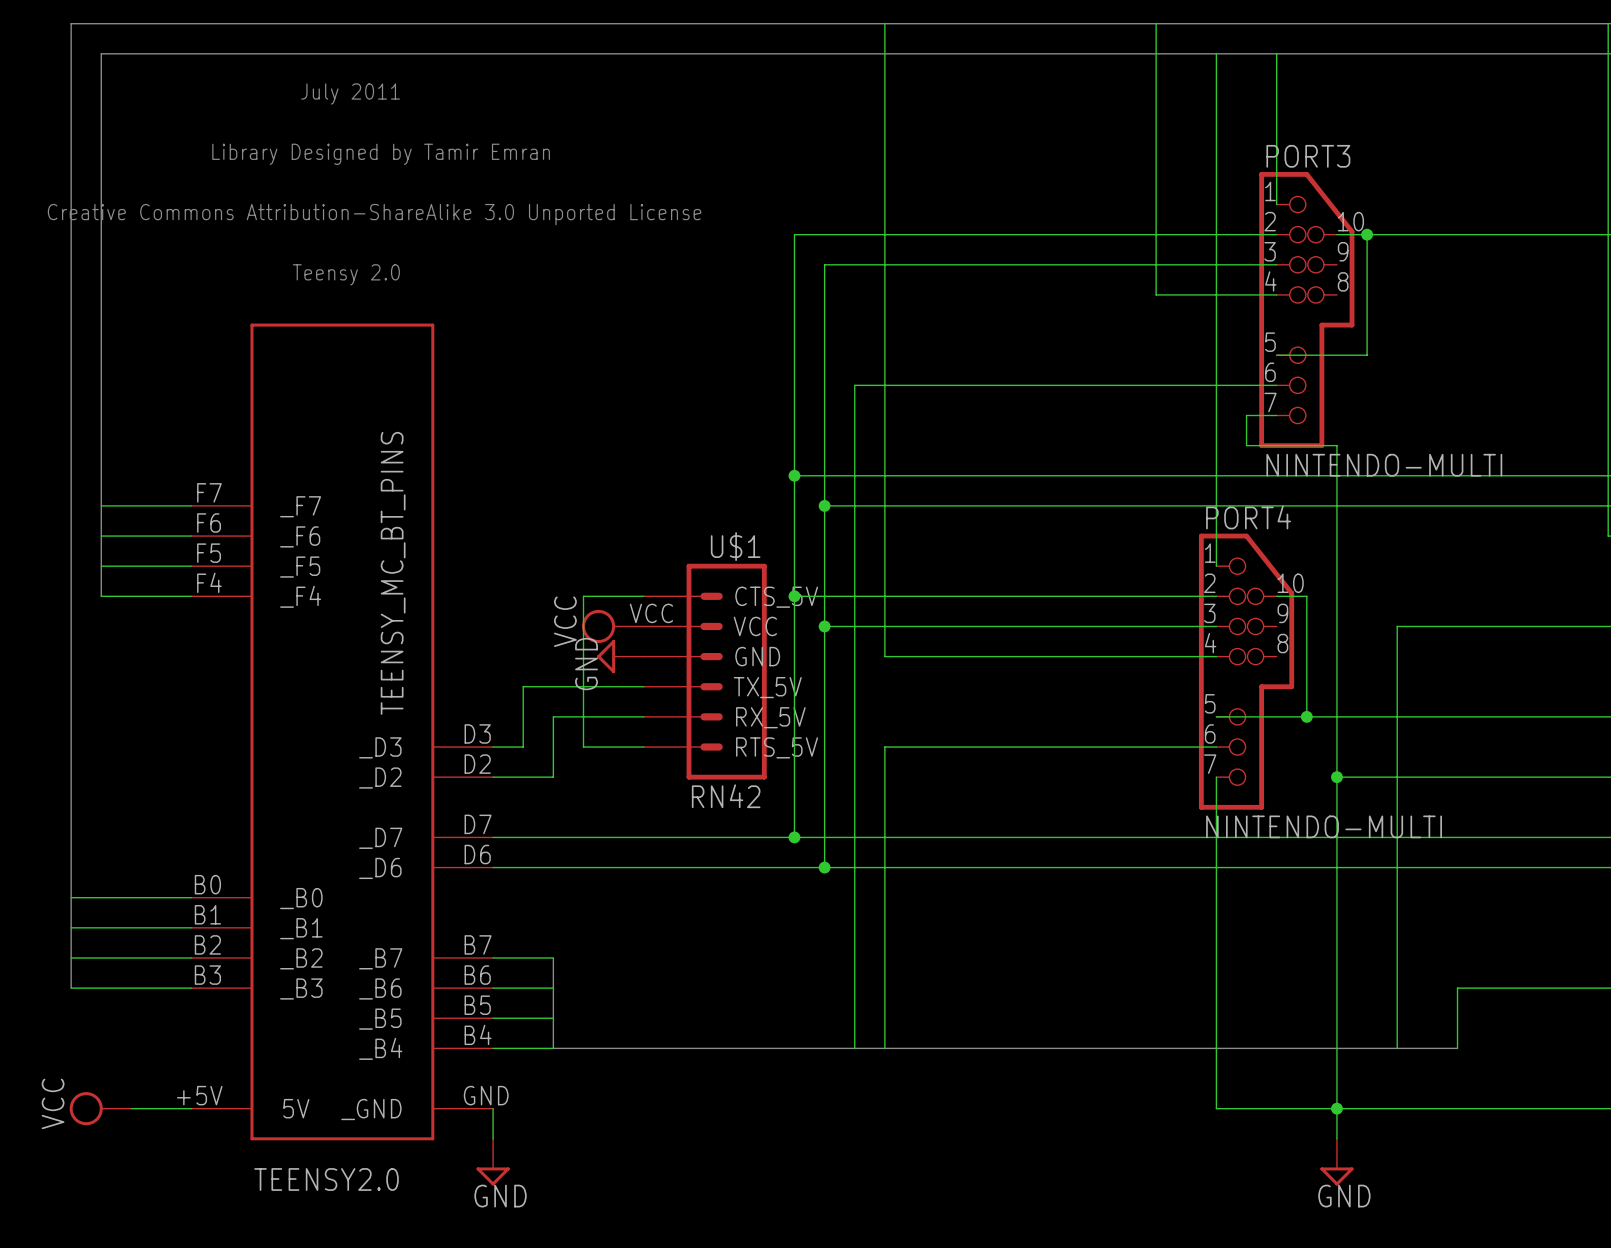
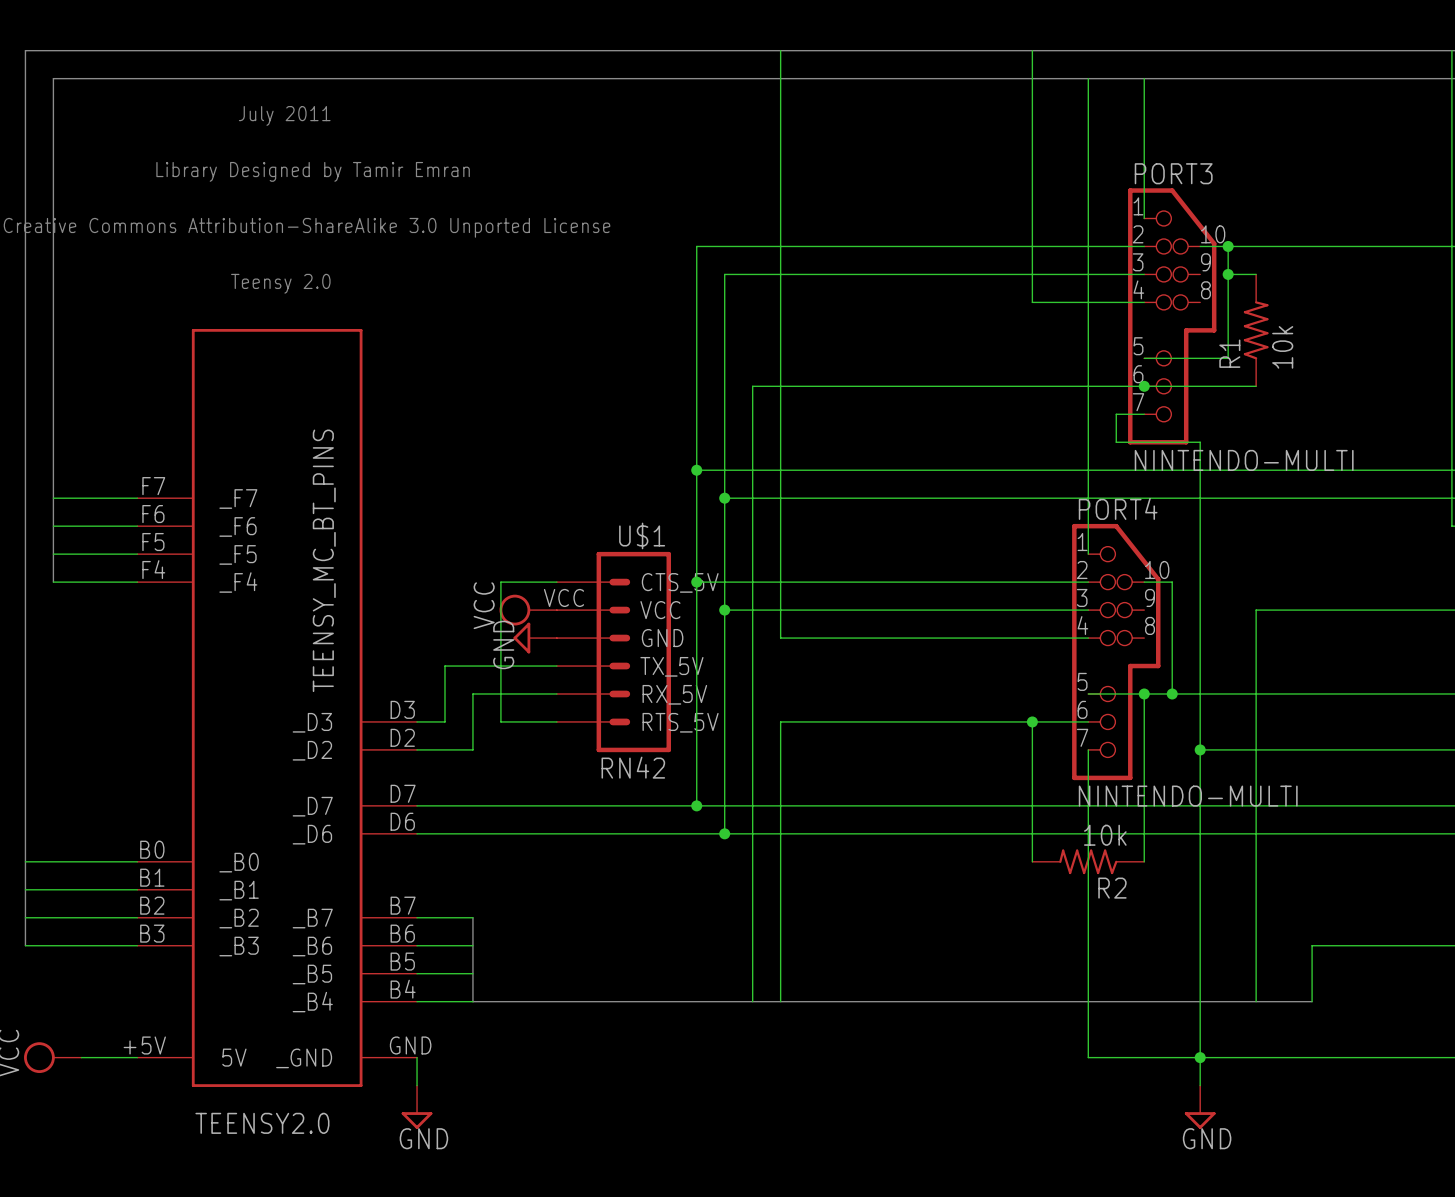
wire: none -> (1228, 274) (1256, 274)
junction: none -> (1228, 274)
R1: none -> 10k (1256, 330)
wire: none -> (1144, 386) (1256, 386)
junction: none -> (1144, 386)
wire: none -> (1144, 693) (1144, 861)
junction: none -> (1144, 693)
wire: none -> (1032, 721) (1032, 861)
junction: none -> (1032, 721)
R2: none -> 10k (1088, 861)

